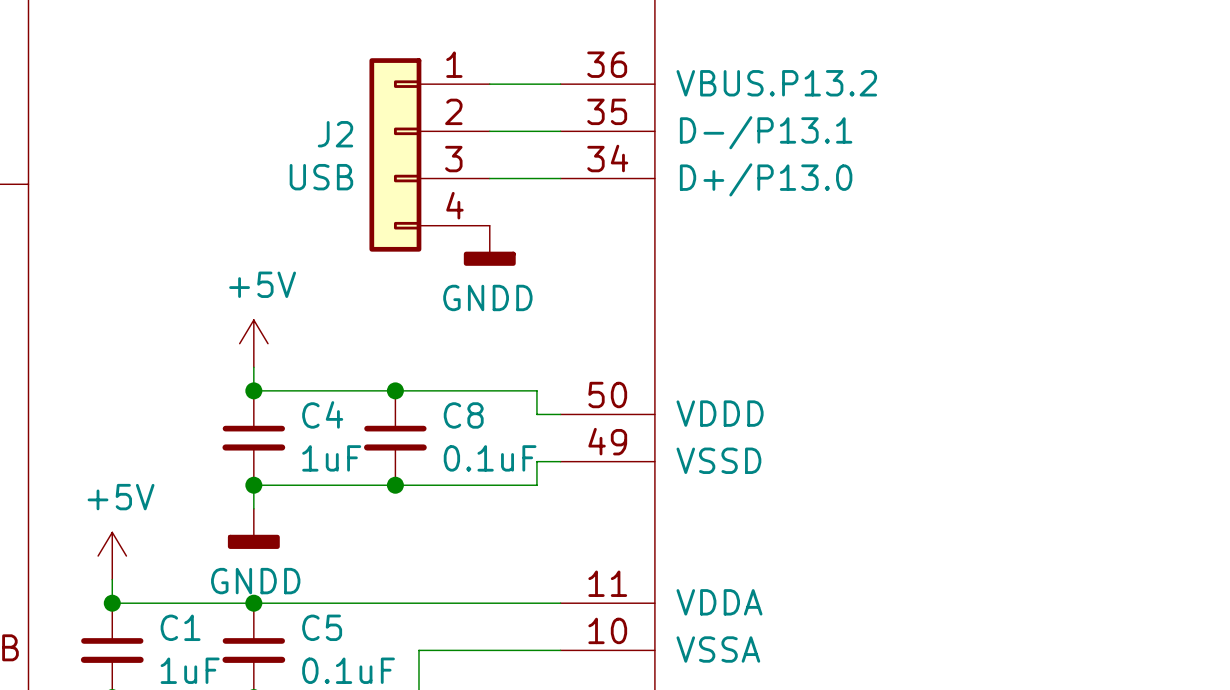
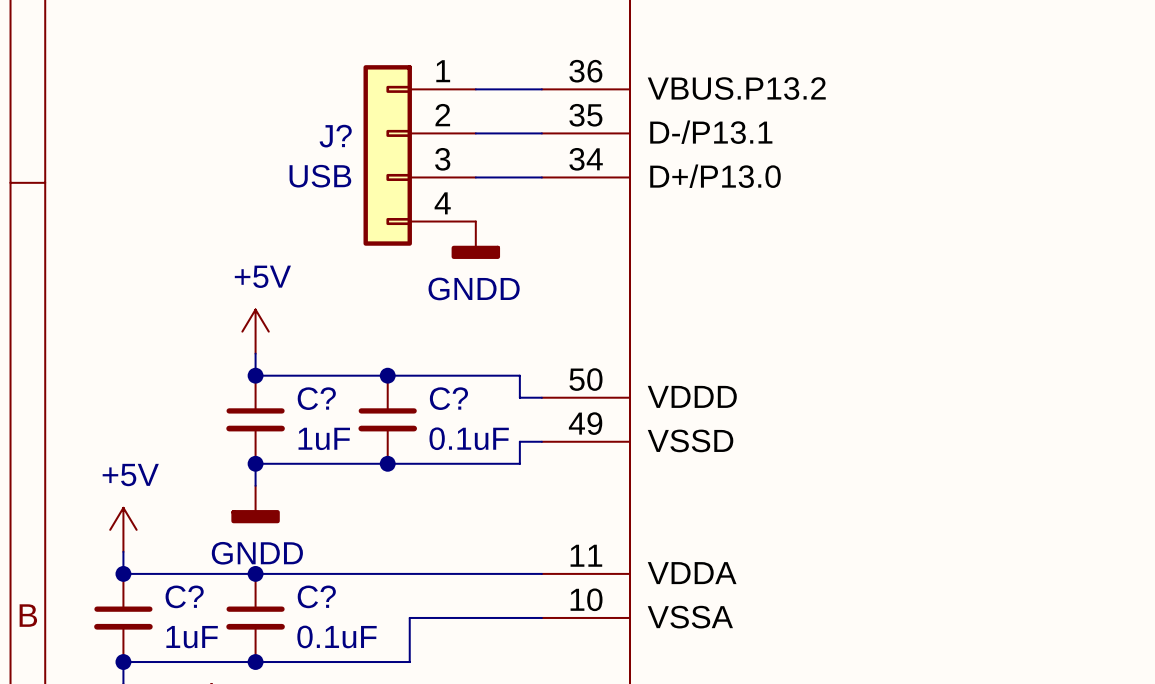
J2 name: J2 (335, 134) -> J? (335, 136)
C4 name: C4 (322, 414) -> C? (316, 398)
C8 name: C8 (463, 415) -> C? (448, 398)
C1 name: C1 (180, 627) -> C? (184, 596)
C5 name: C5 (322, 627) -> C? (316, 596)

